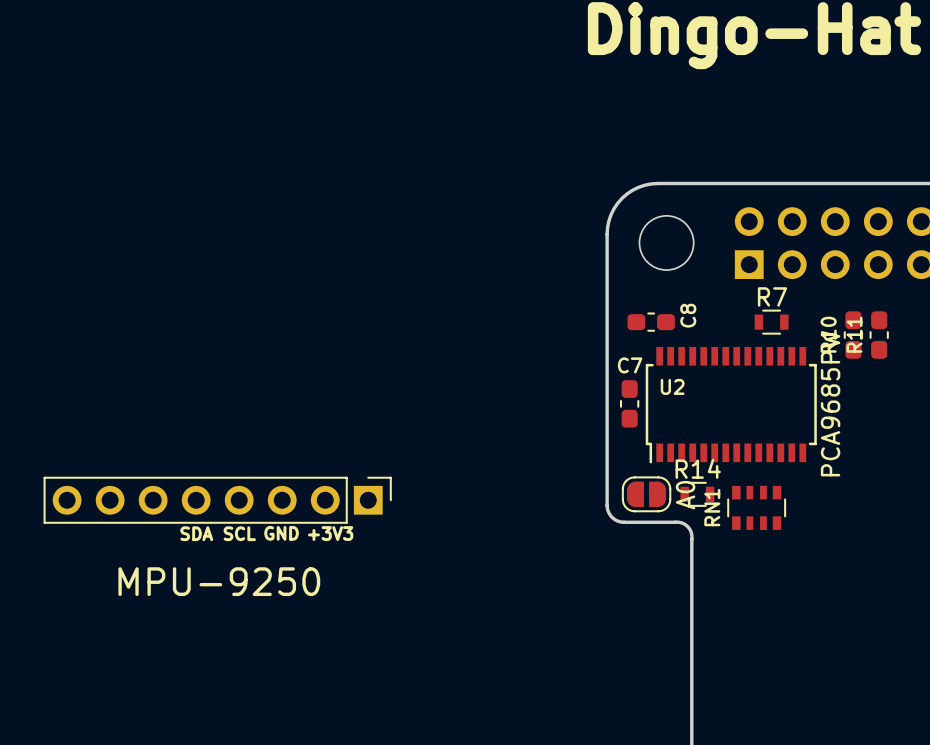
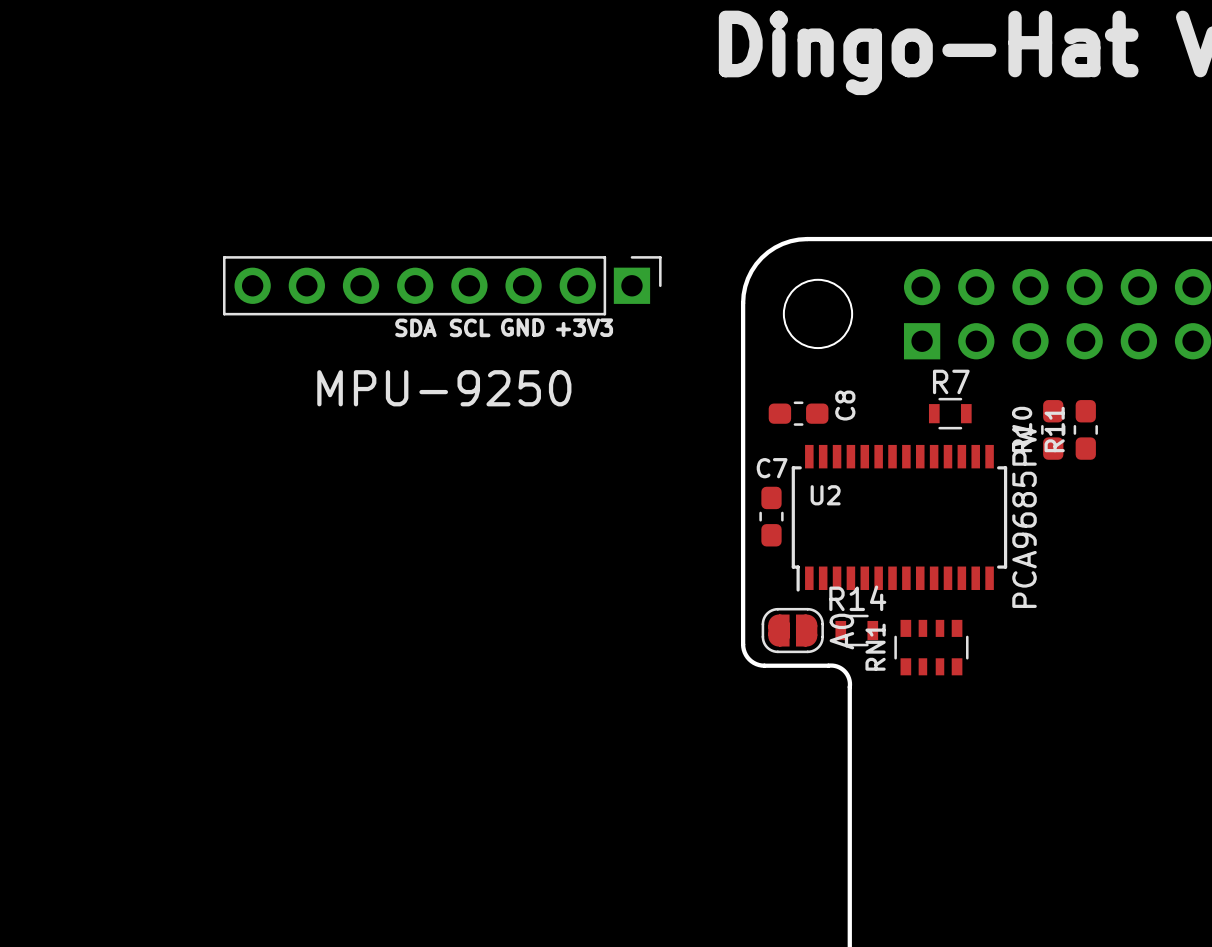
part position: (217, 500) -> (442, 285)
text position: SDA (196, 533) -> SDA (415, 327)
text position: SCL (239, 533) -> SCL (470, 327)
text position: GND (281, 533) -> GND (522, 327)
text position: +3V3 (330, 533) -> +3V3 (584, 327)

